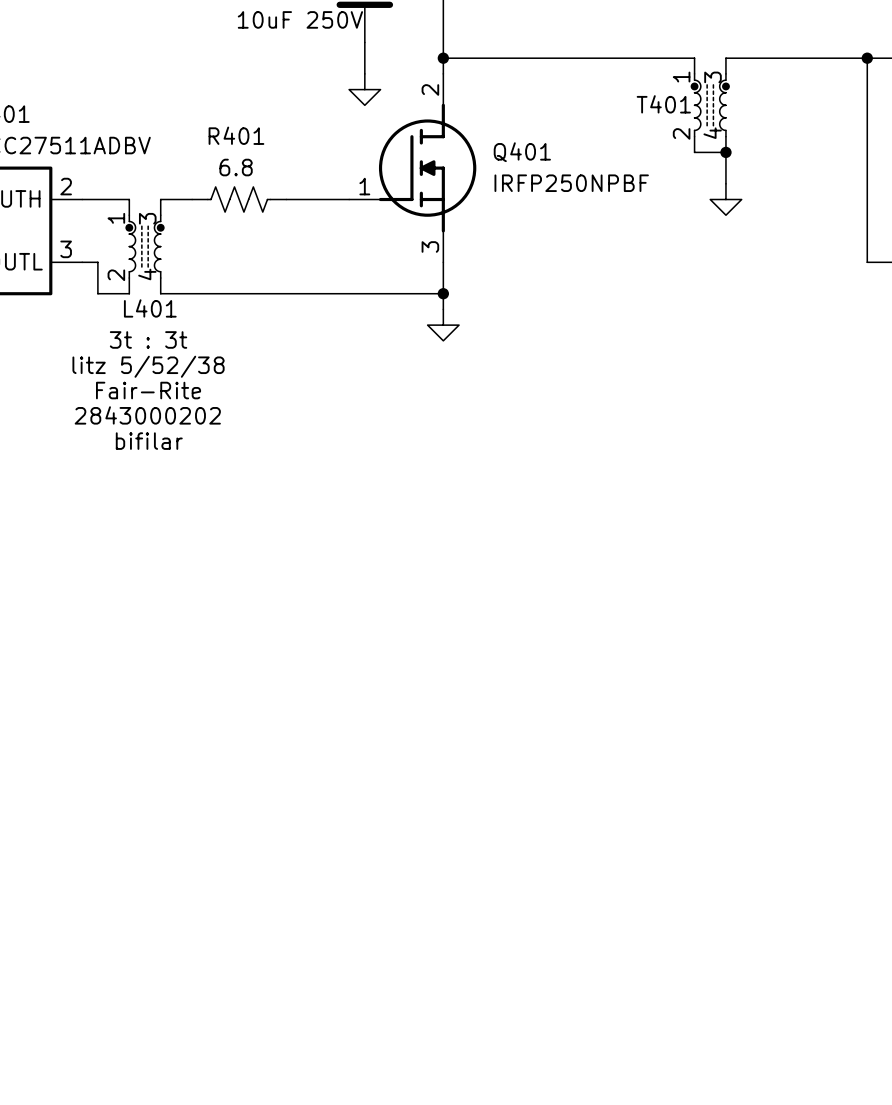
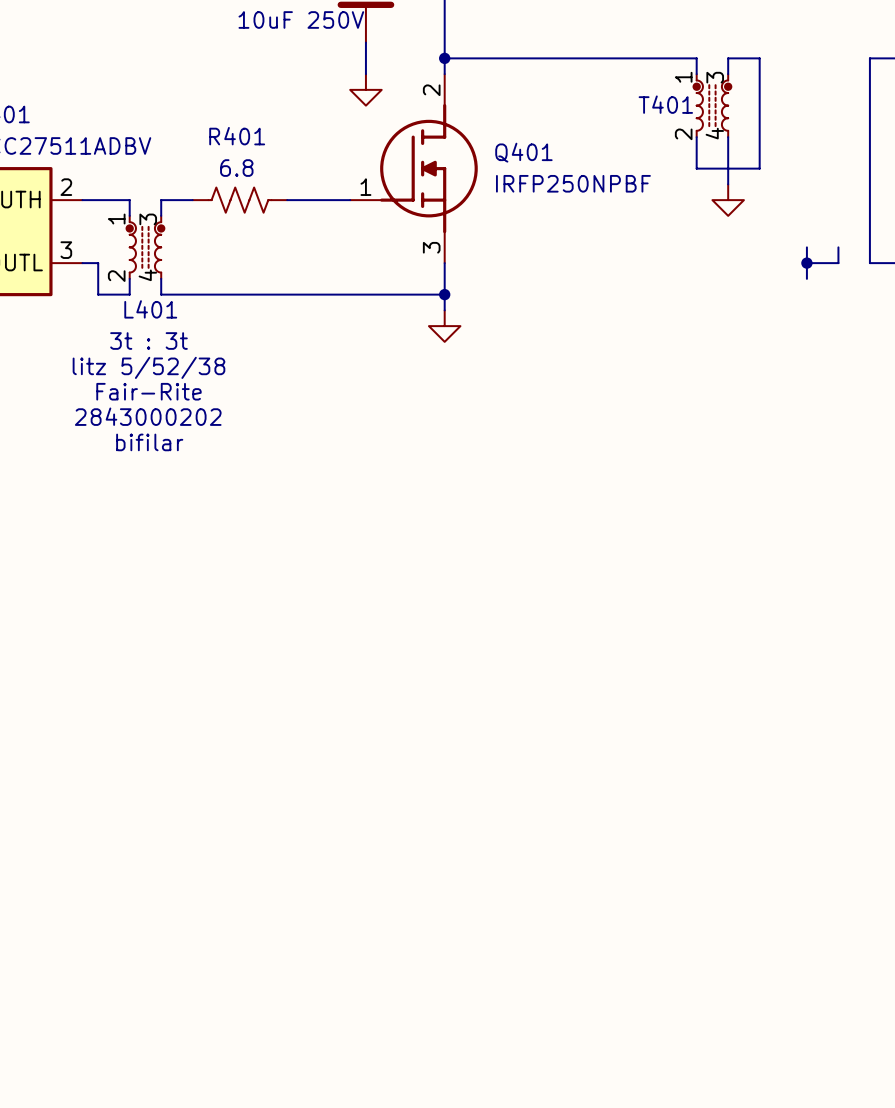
wire: (757, 58) (867, 58) -> none
junction: (867, 58) -> none
wire: (694, 152) (725, 152) -> (696, 152) (696, 168) (759, 168) (759, 58)
junction: (725, 152) -> none
wire: none -> (806, 247) (806, 278)
wire: none -> (838, 247) (838, 263) (806, 263)
junction: none -> (806, 263)

